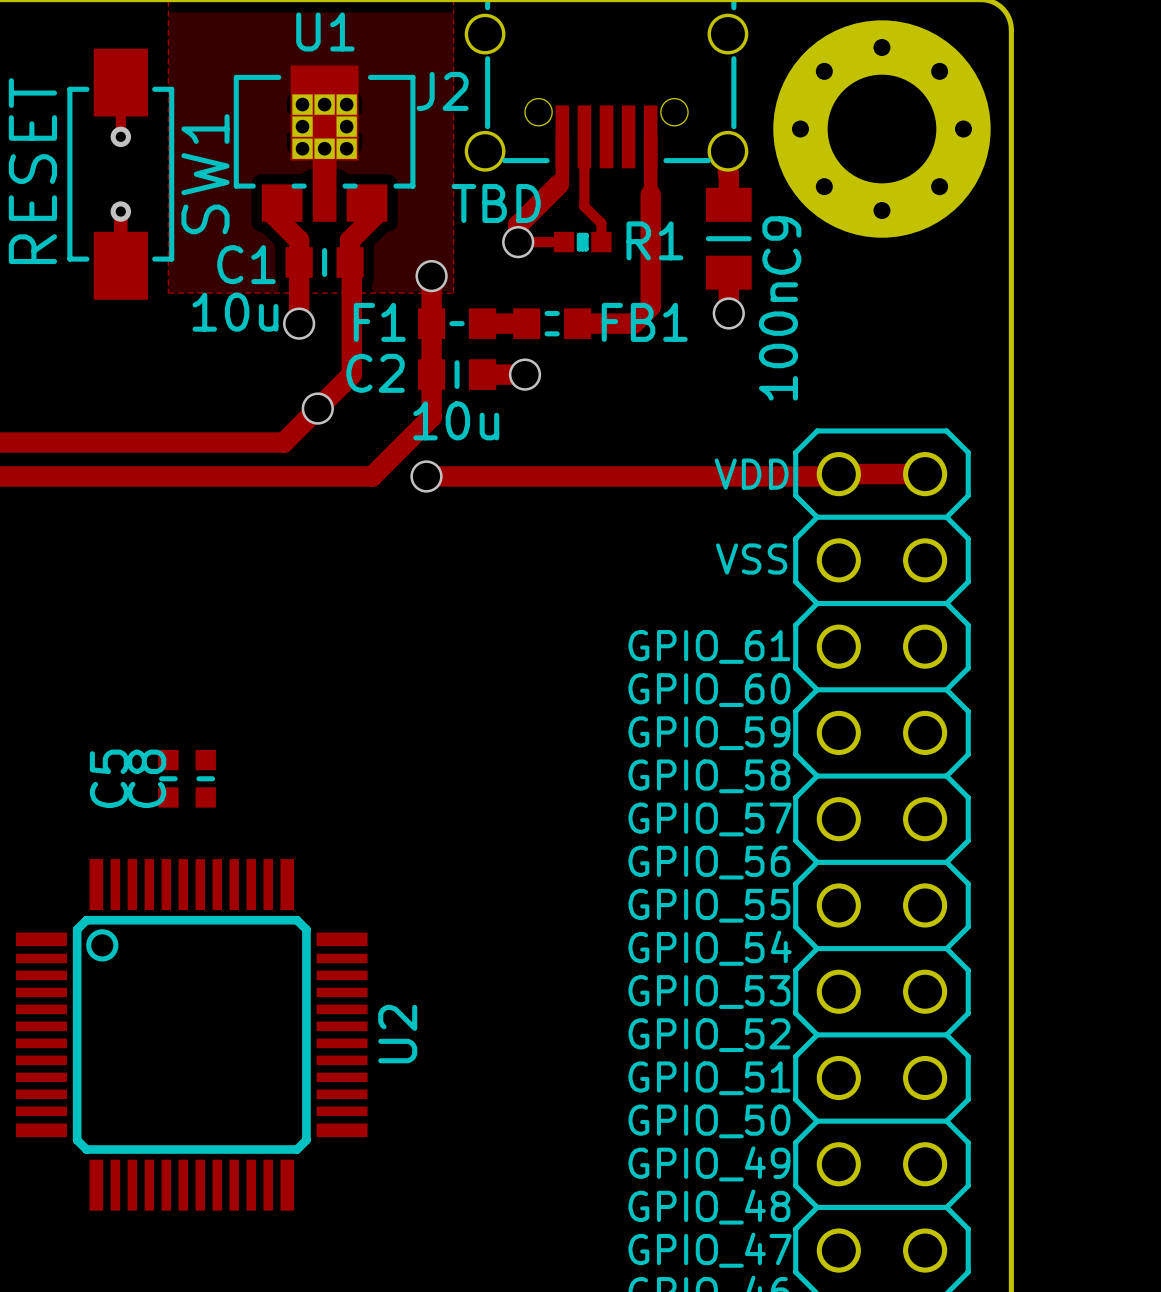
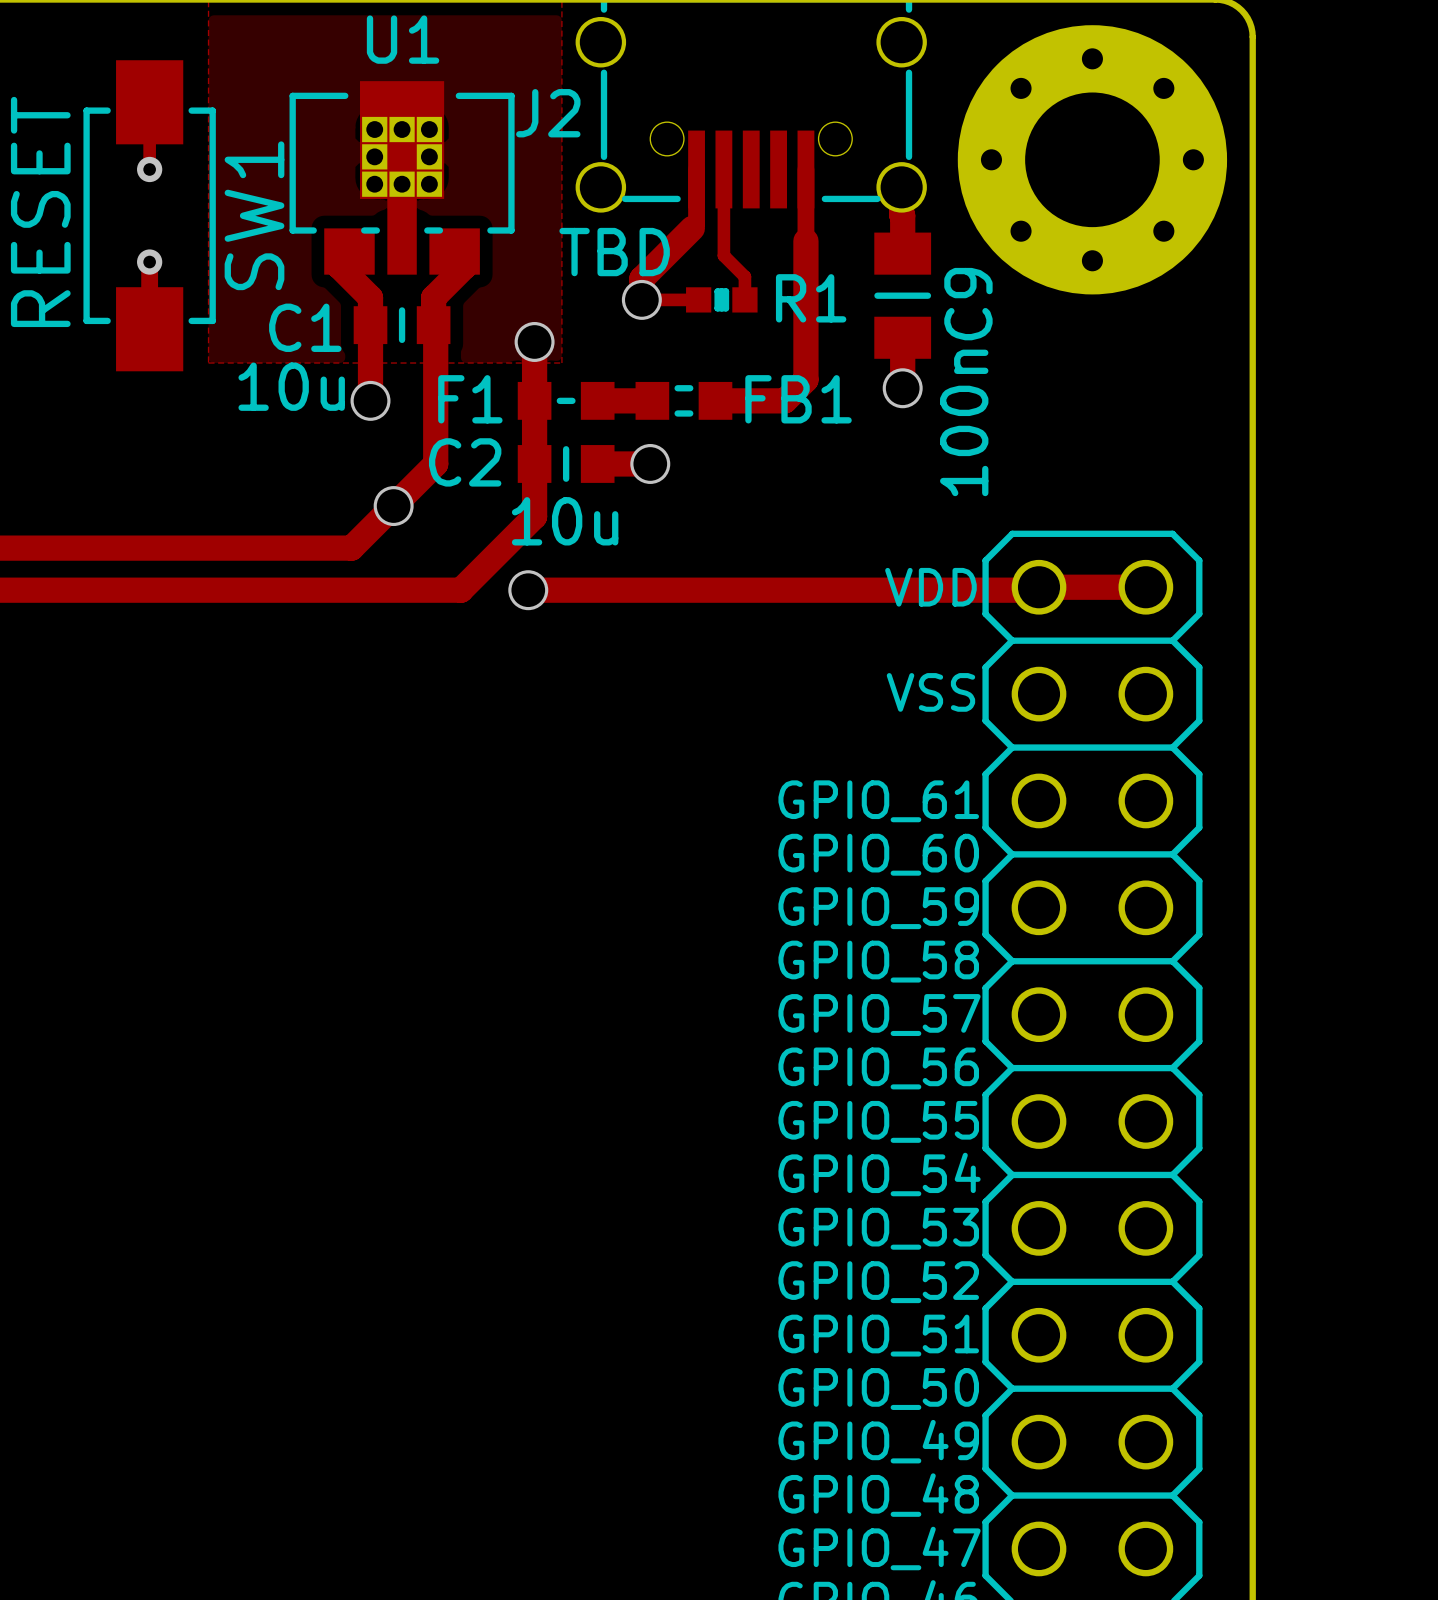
C5: (168, 778) -> none
C8: (205, 778) -> none
U2: (191, 1034) -> none

